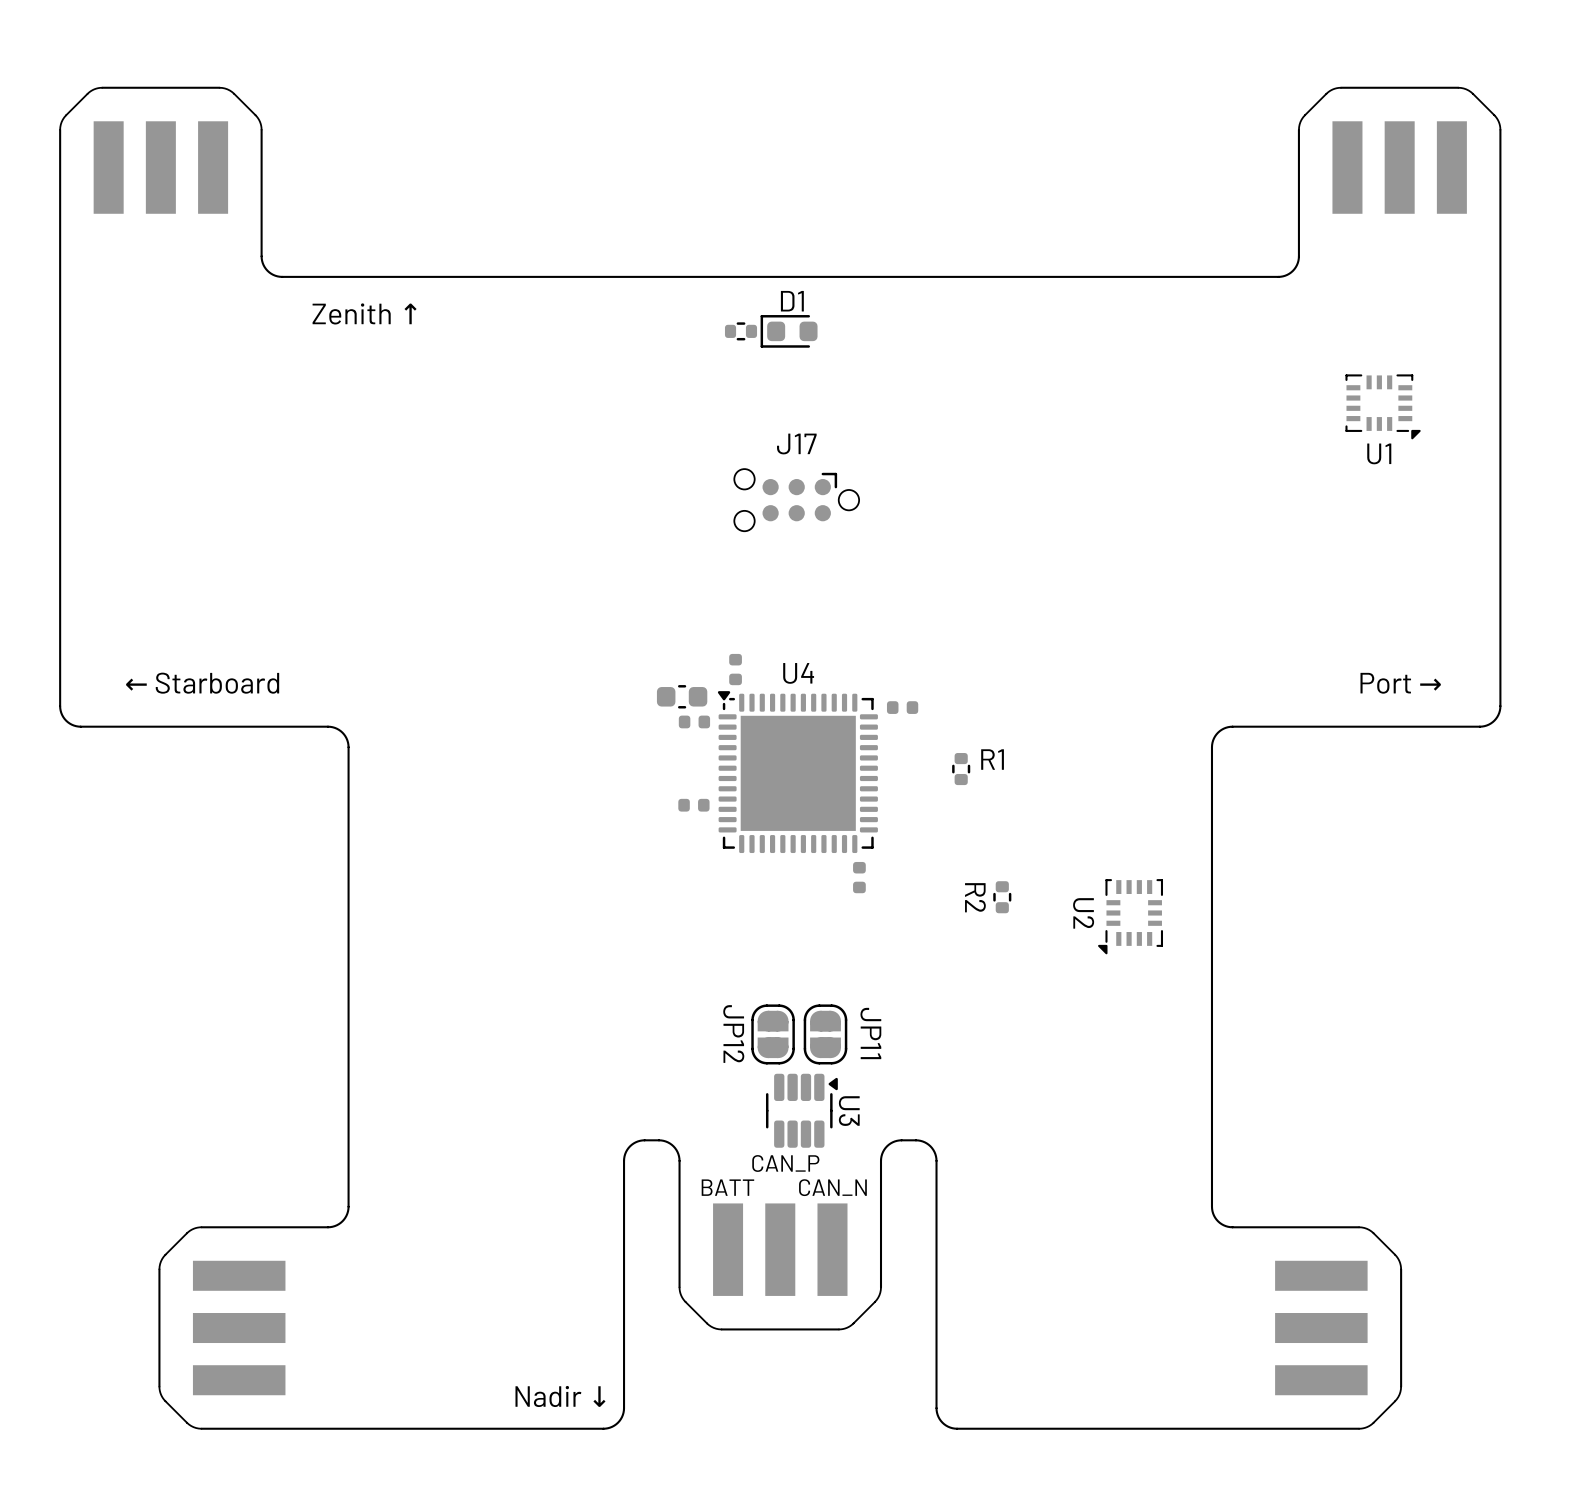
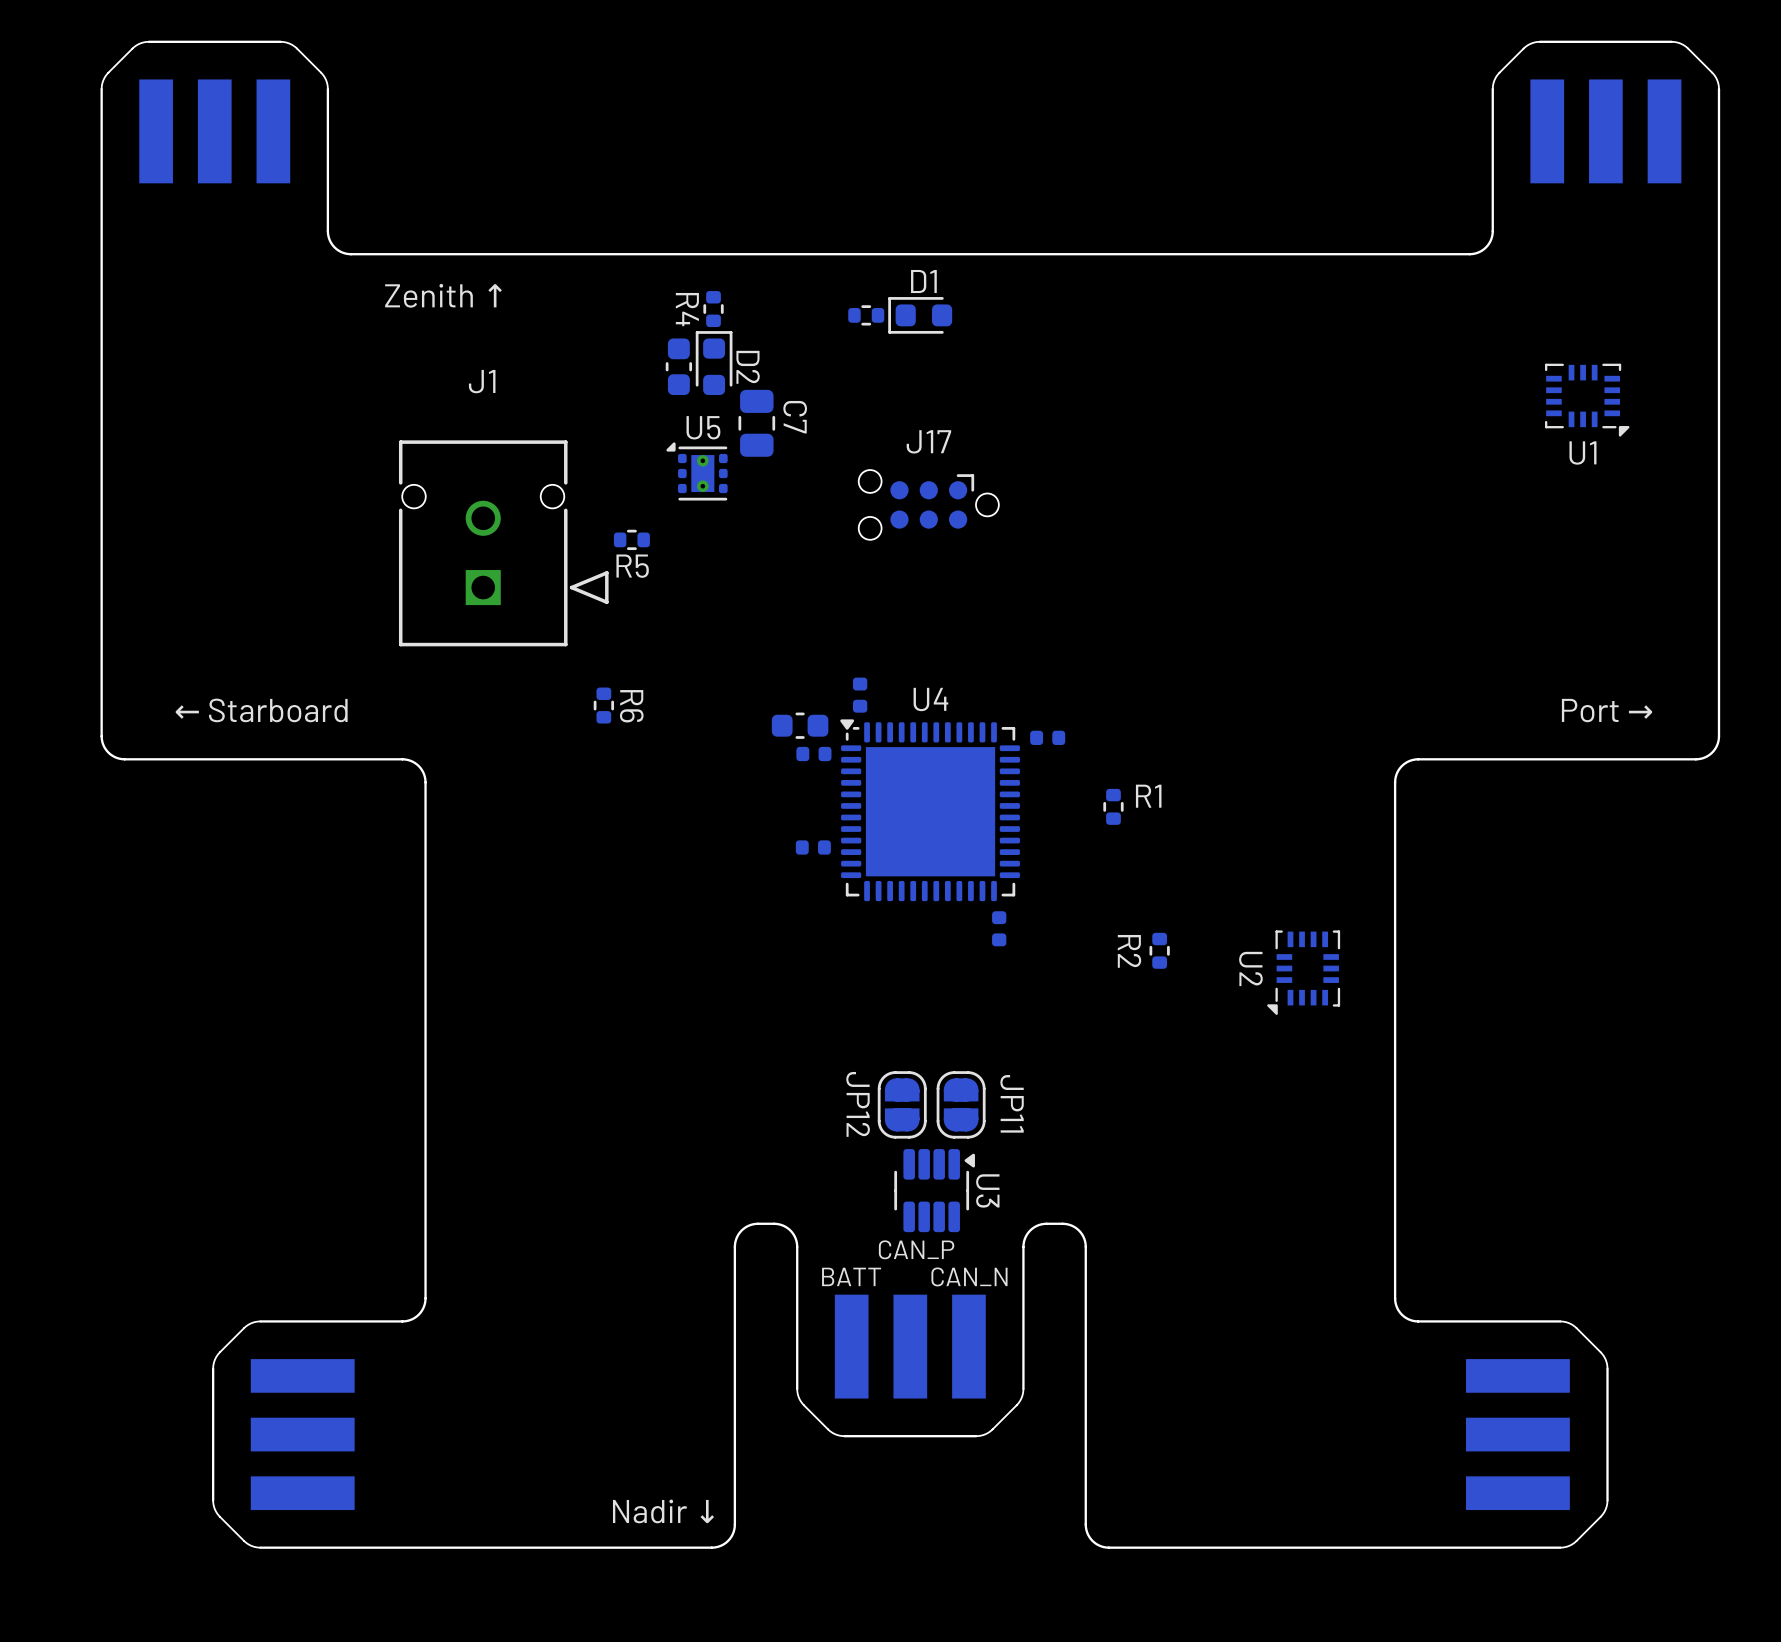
R4: none -> (713, 309)
D2: none -> (714, 363)
part: none -> (678, 366)
C7: none -> (756, 423)
U5: none -> (697, 471)
R5: none -> (631, 539)
J1: none -> (503, 543)
R6: none -> (603, 705)

